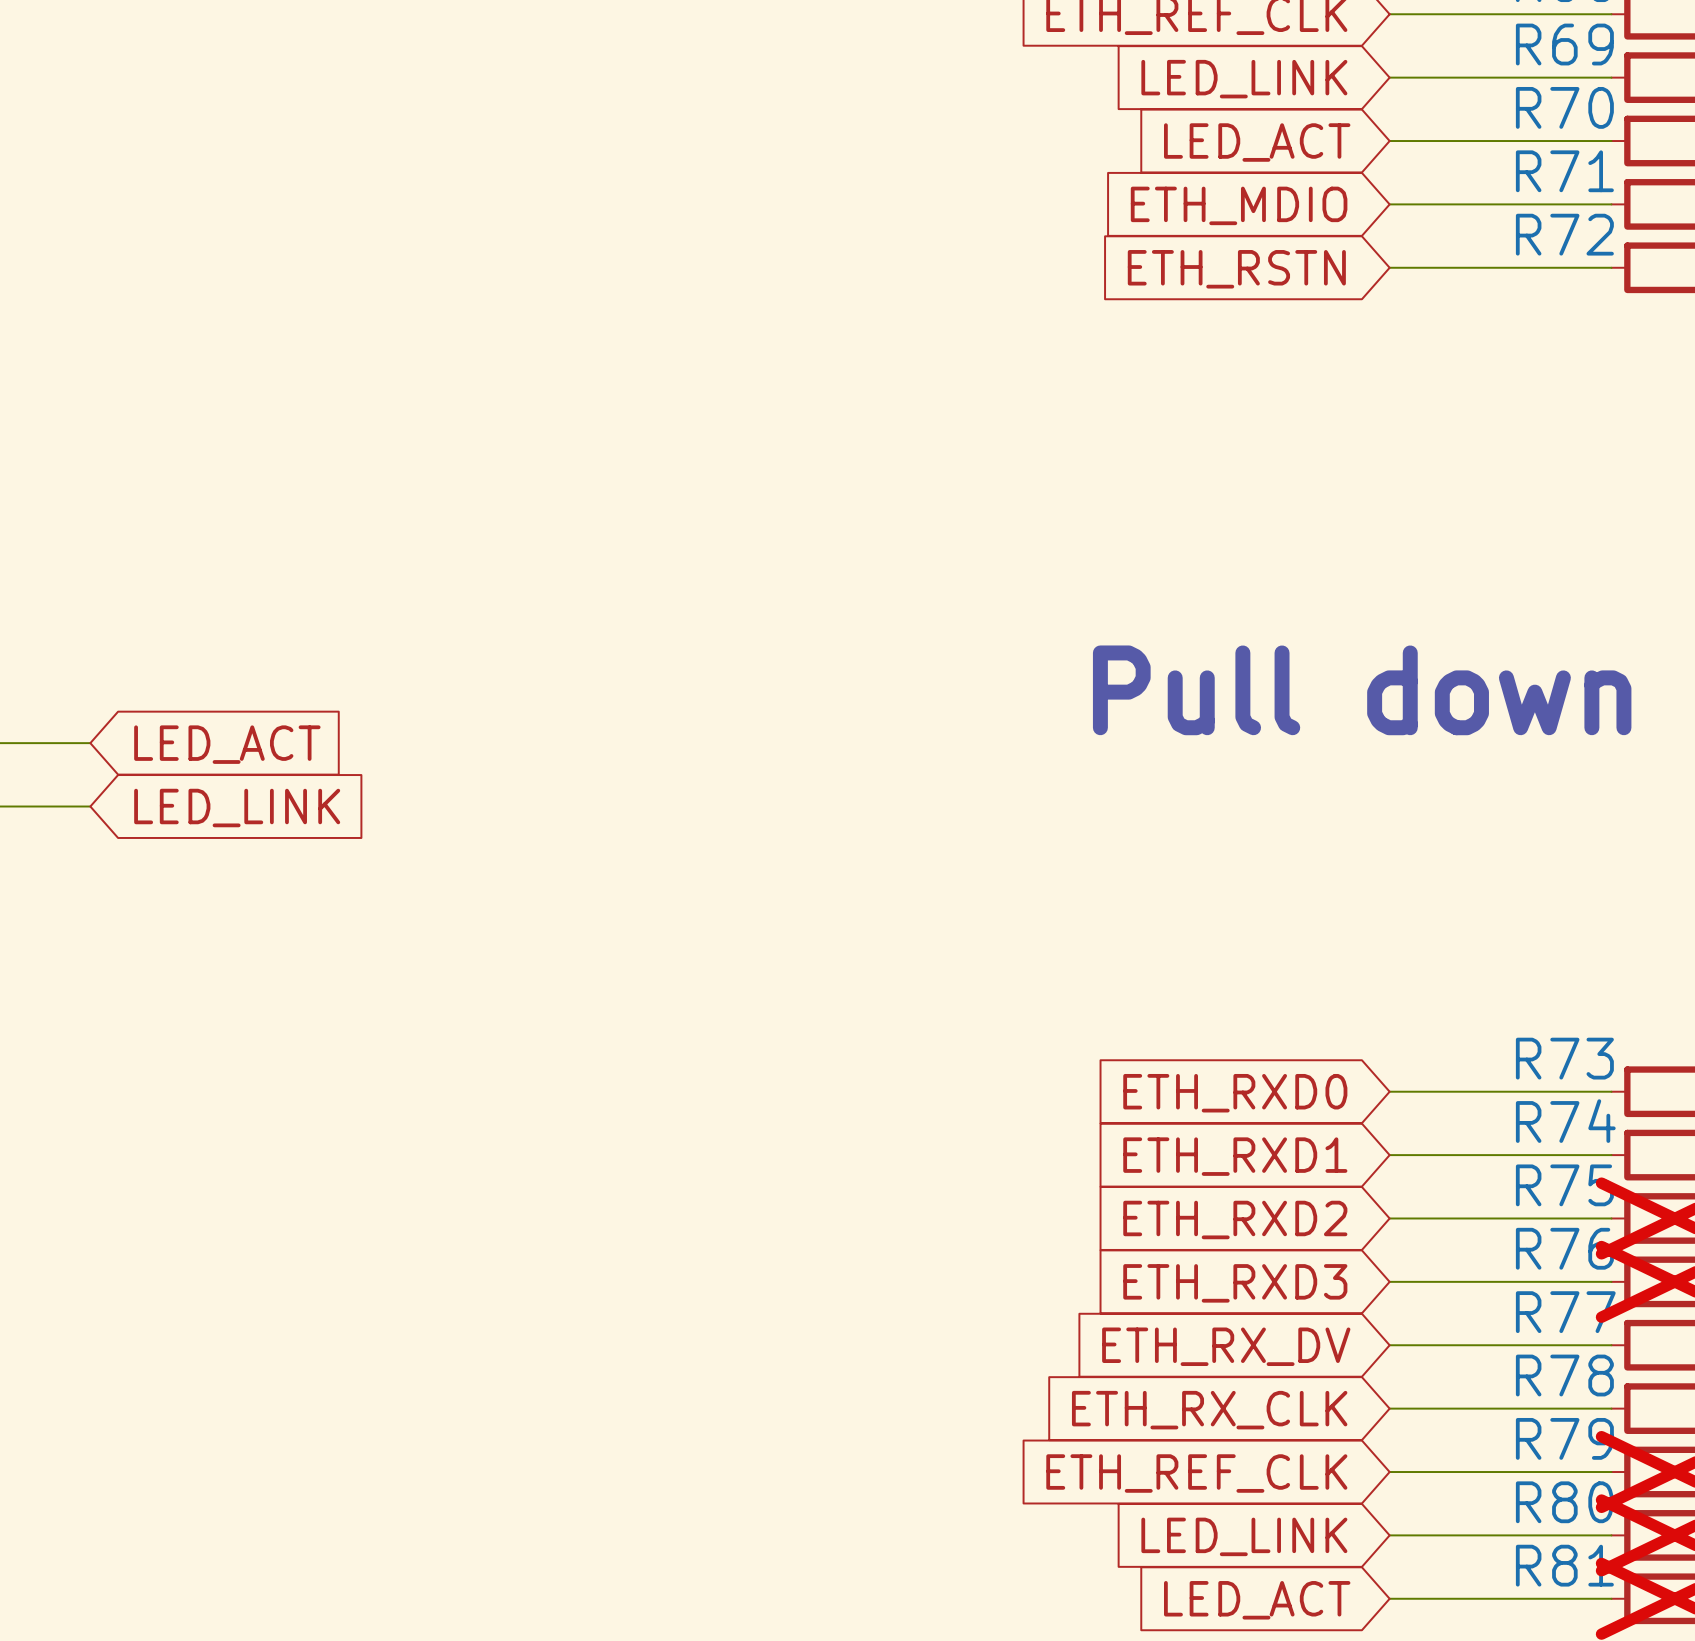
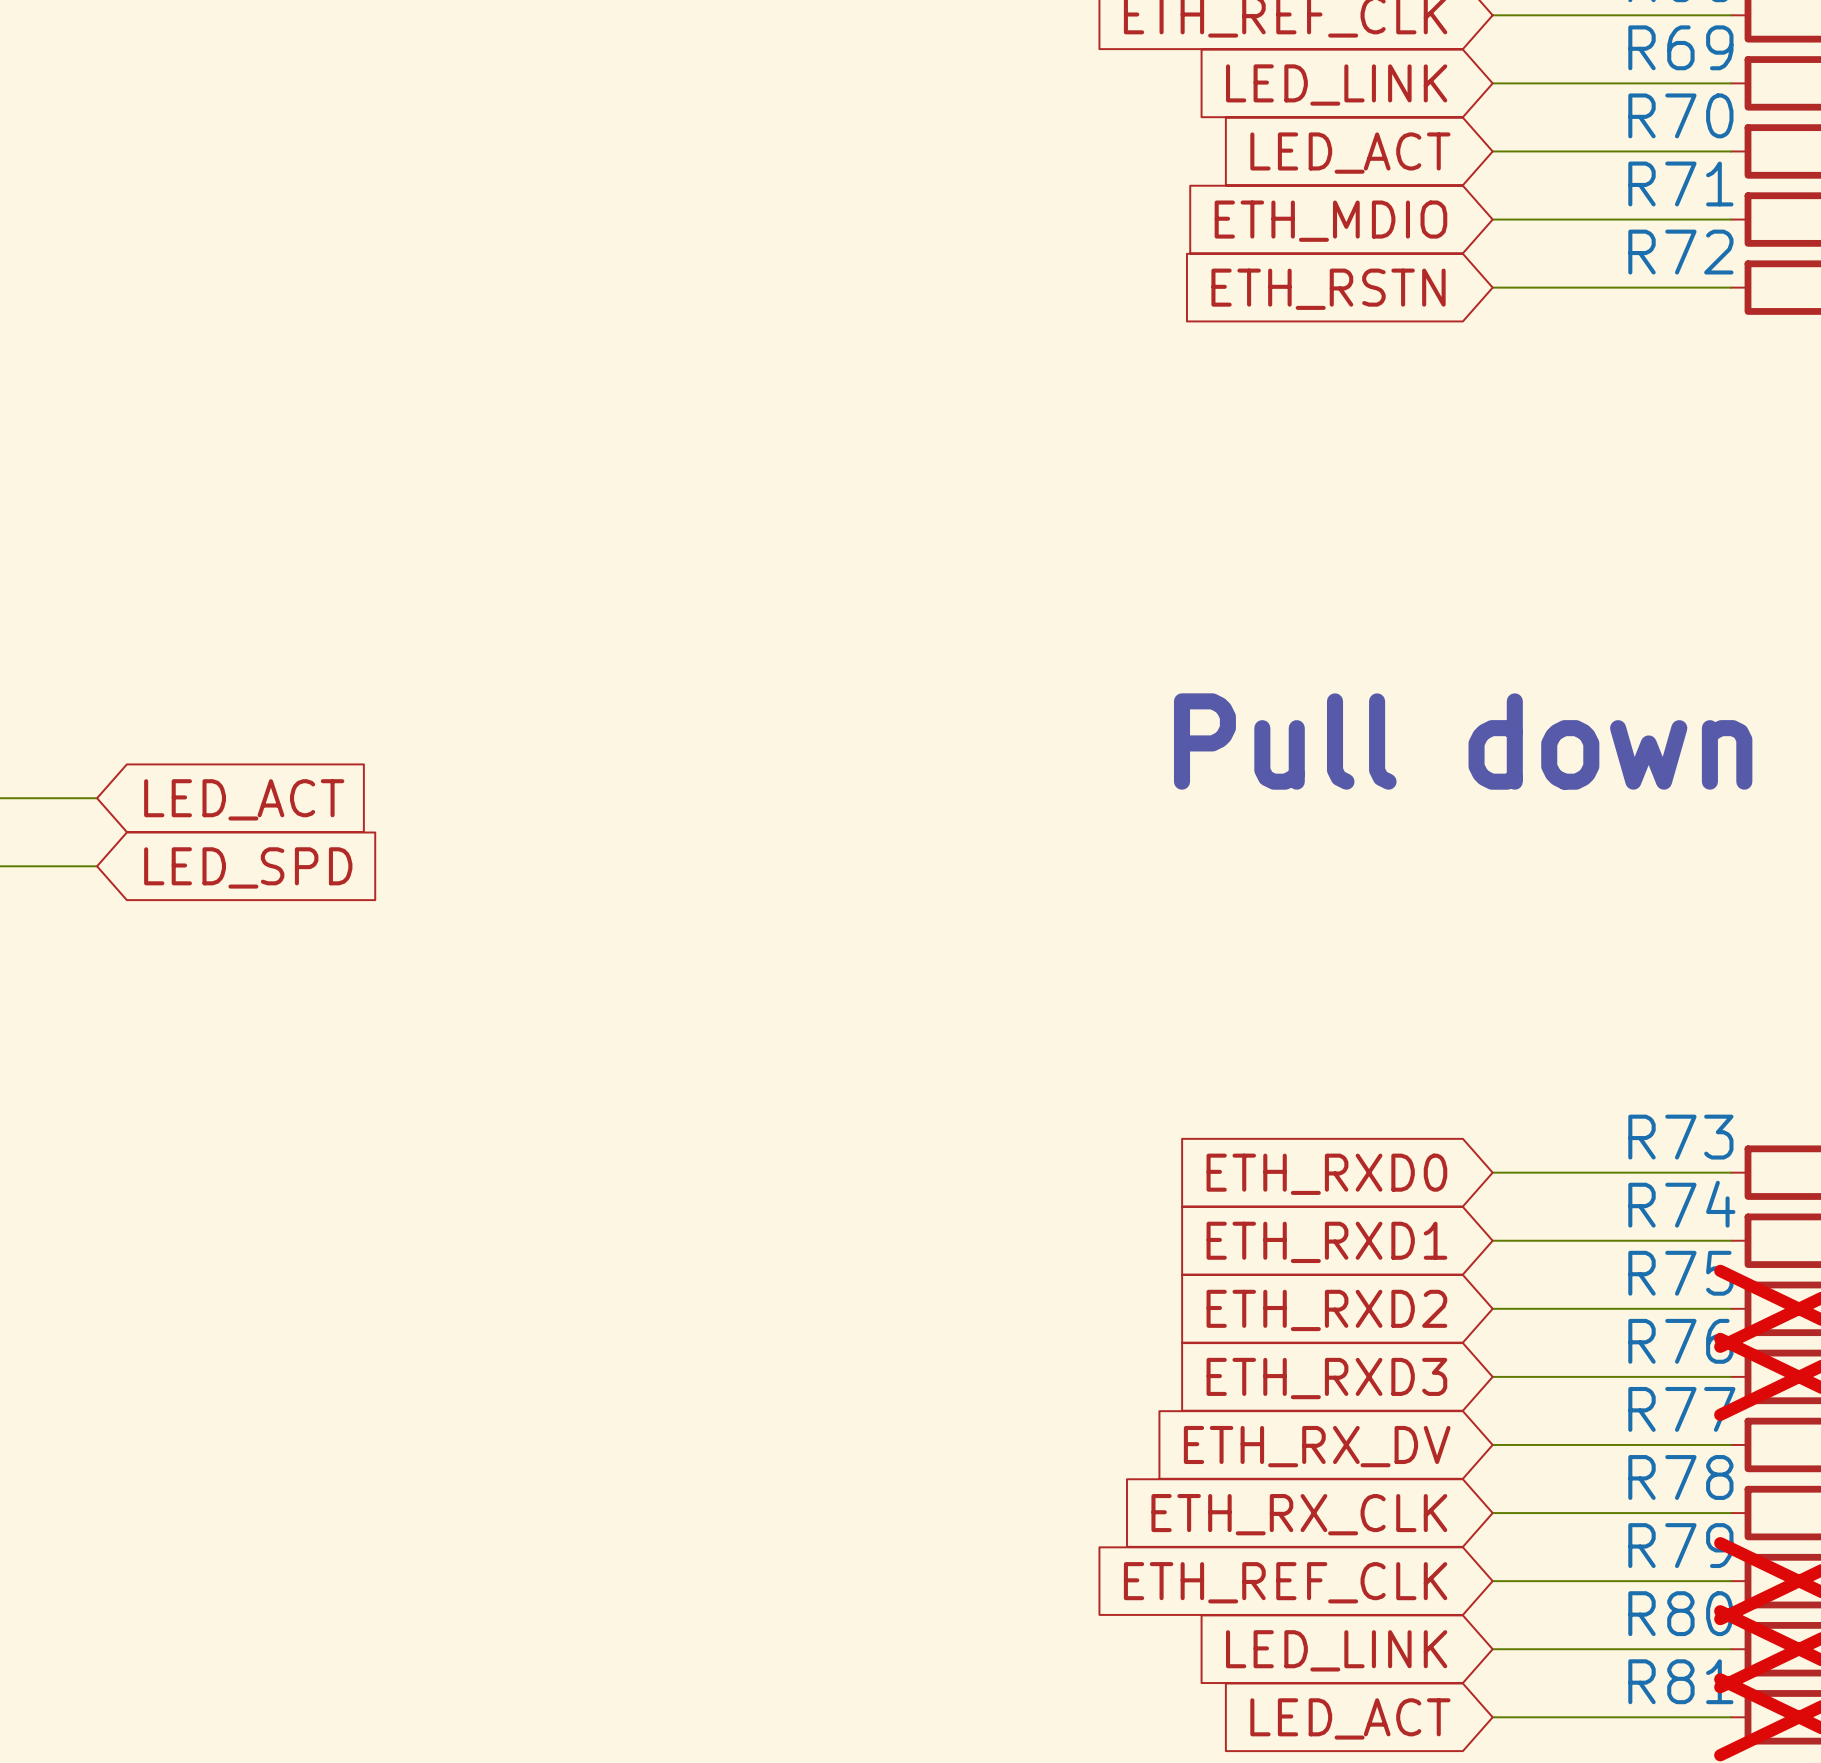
global label: LED_LINK (237, 808) -> LED_SPD (248, 867)

